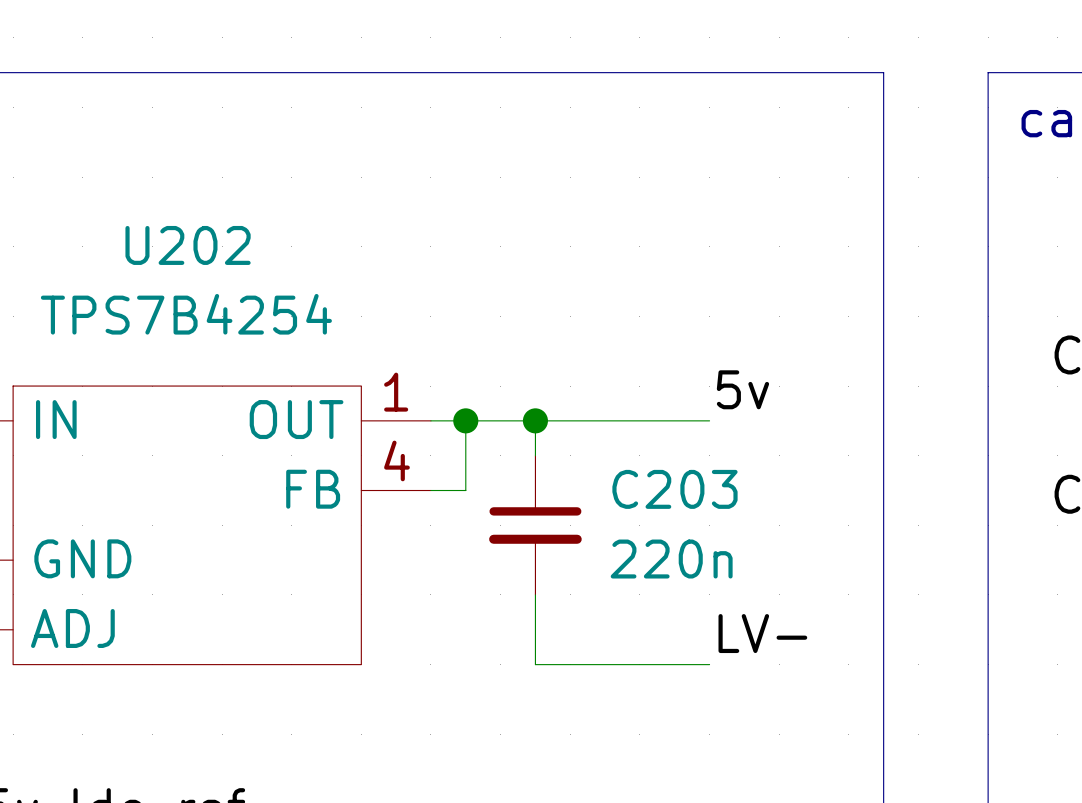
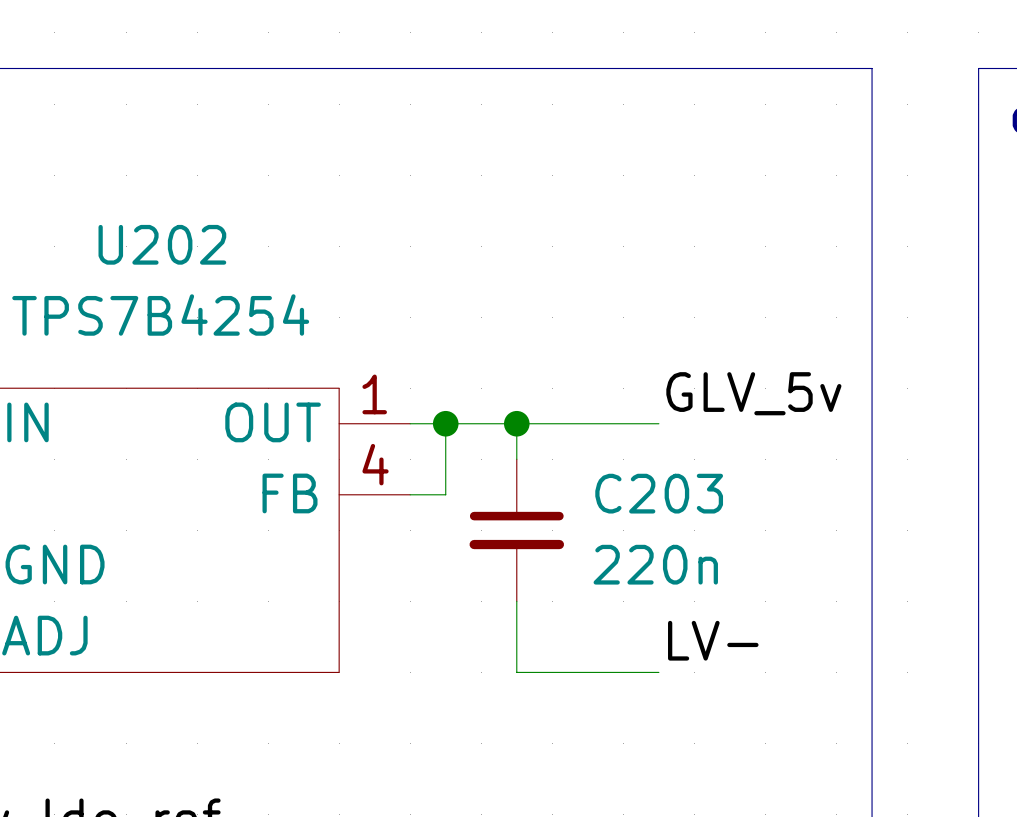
label: 5v (742, 389) -> none
label: none -> GLV_5v (753, 393)
wire: (674, 420) (709, 420) -> none
label position: LV- (762, 633) -> LV- (713, 640)
wire: (674, 664) (709, 664) -> none

